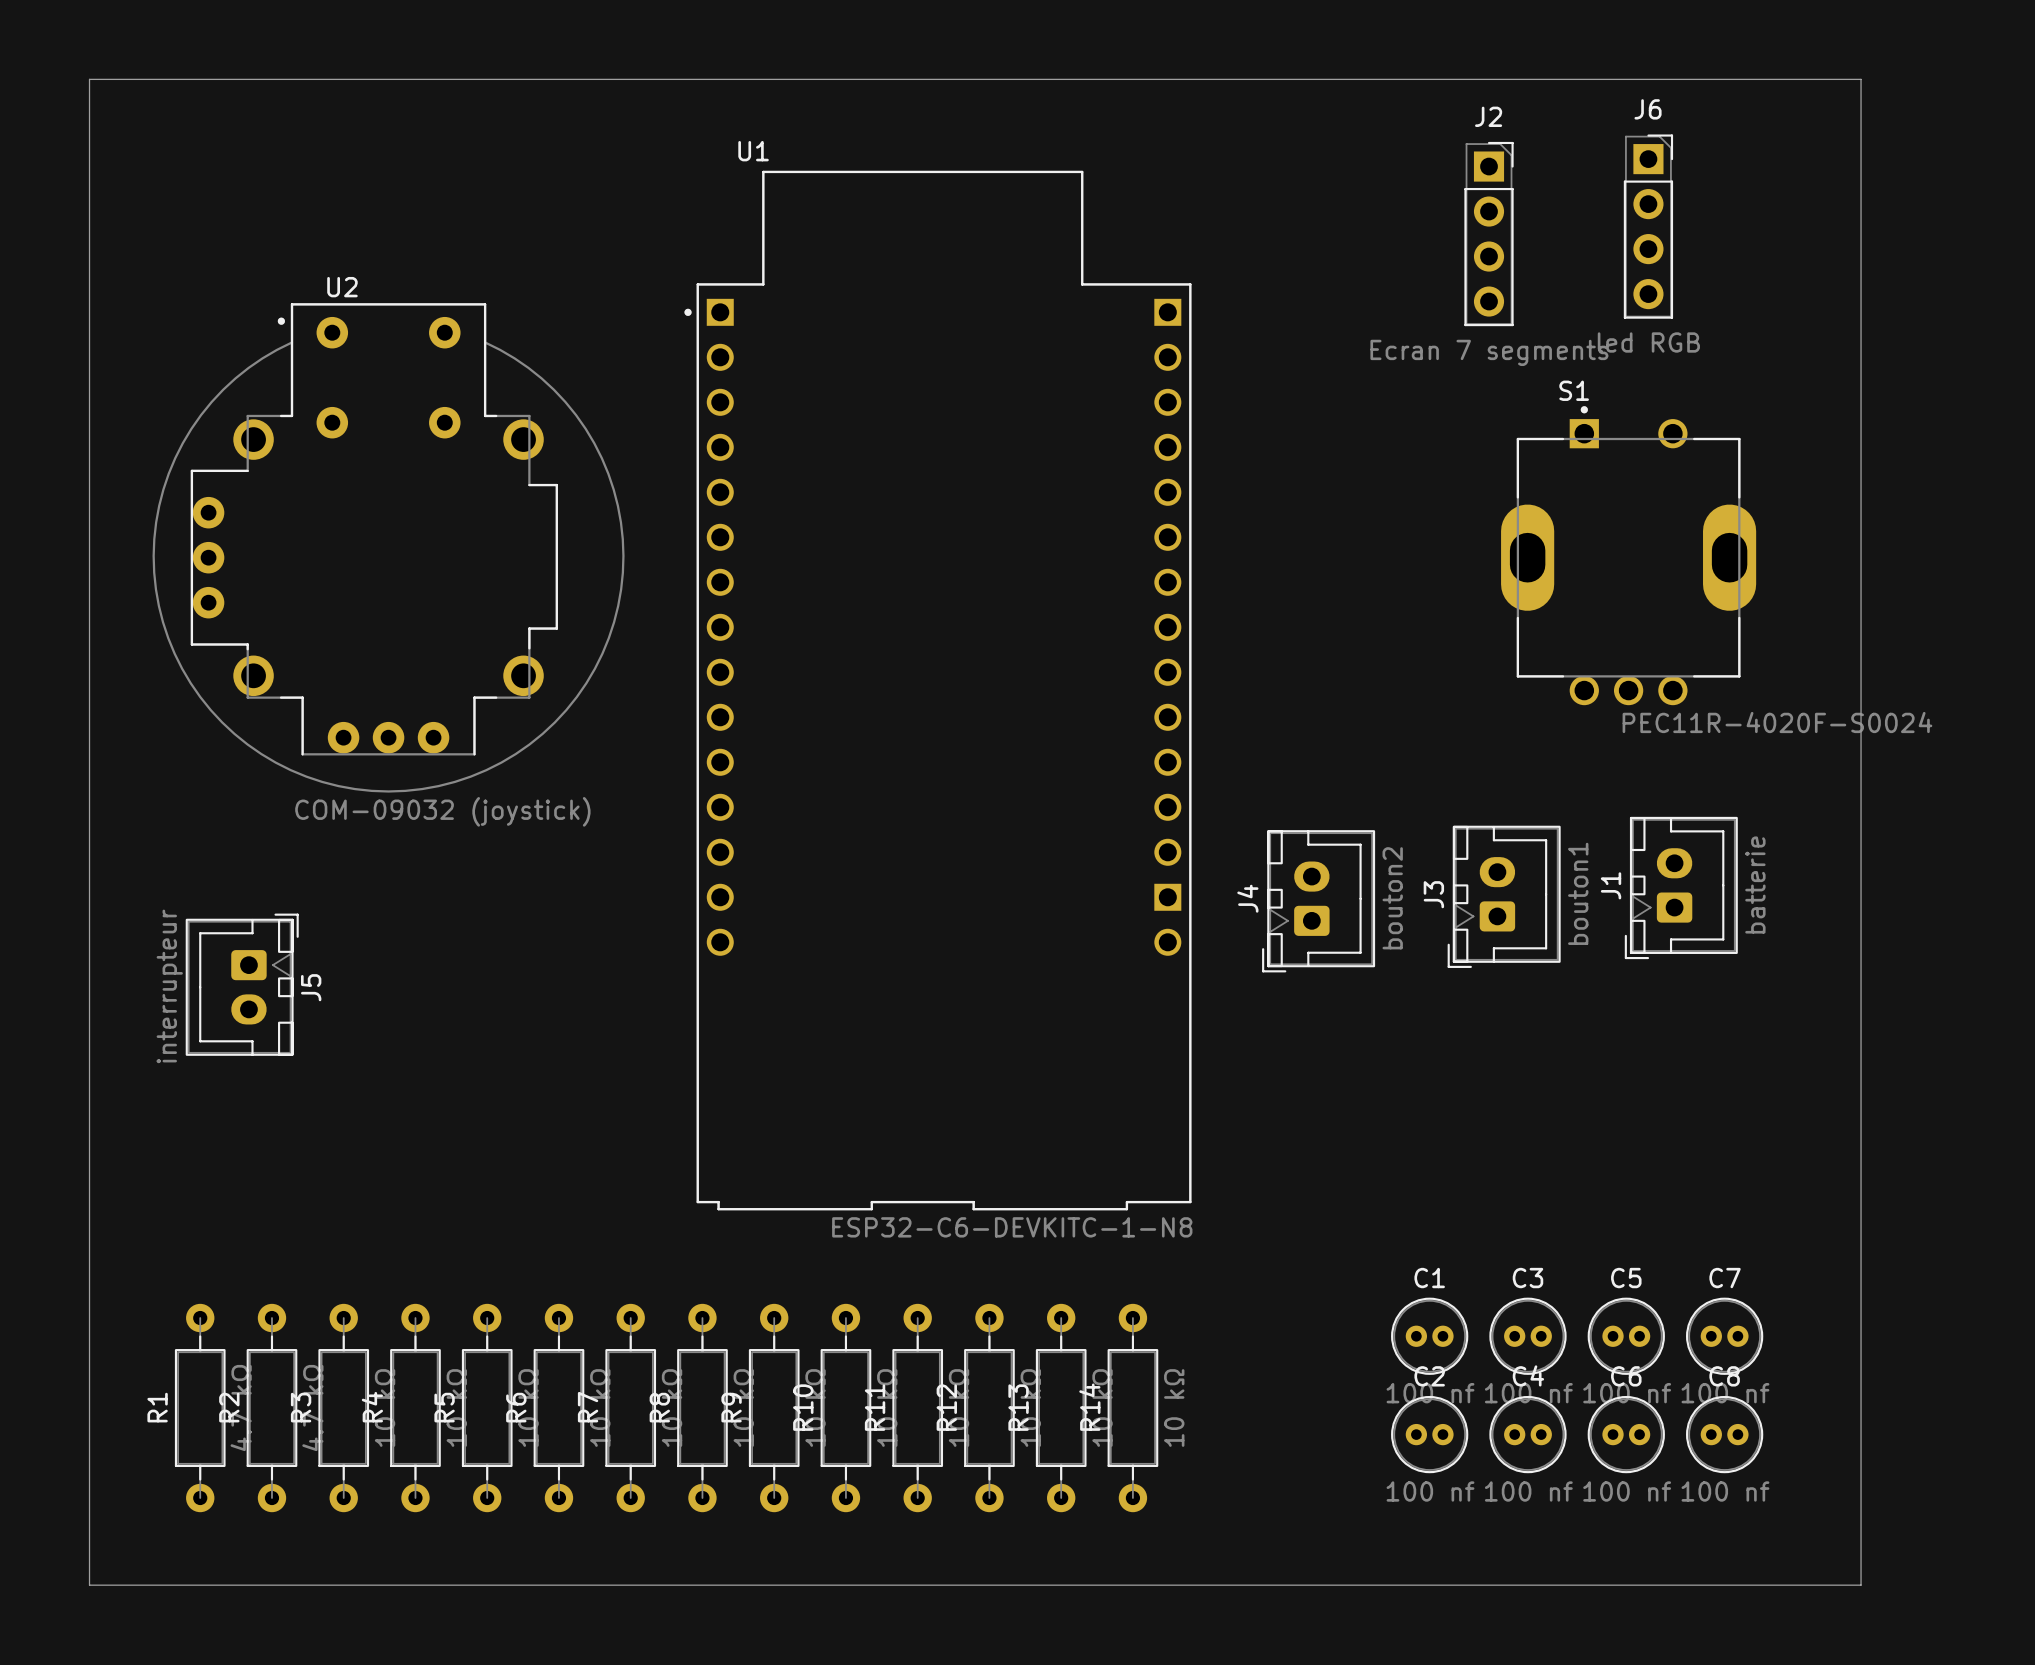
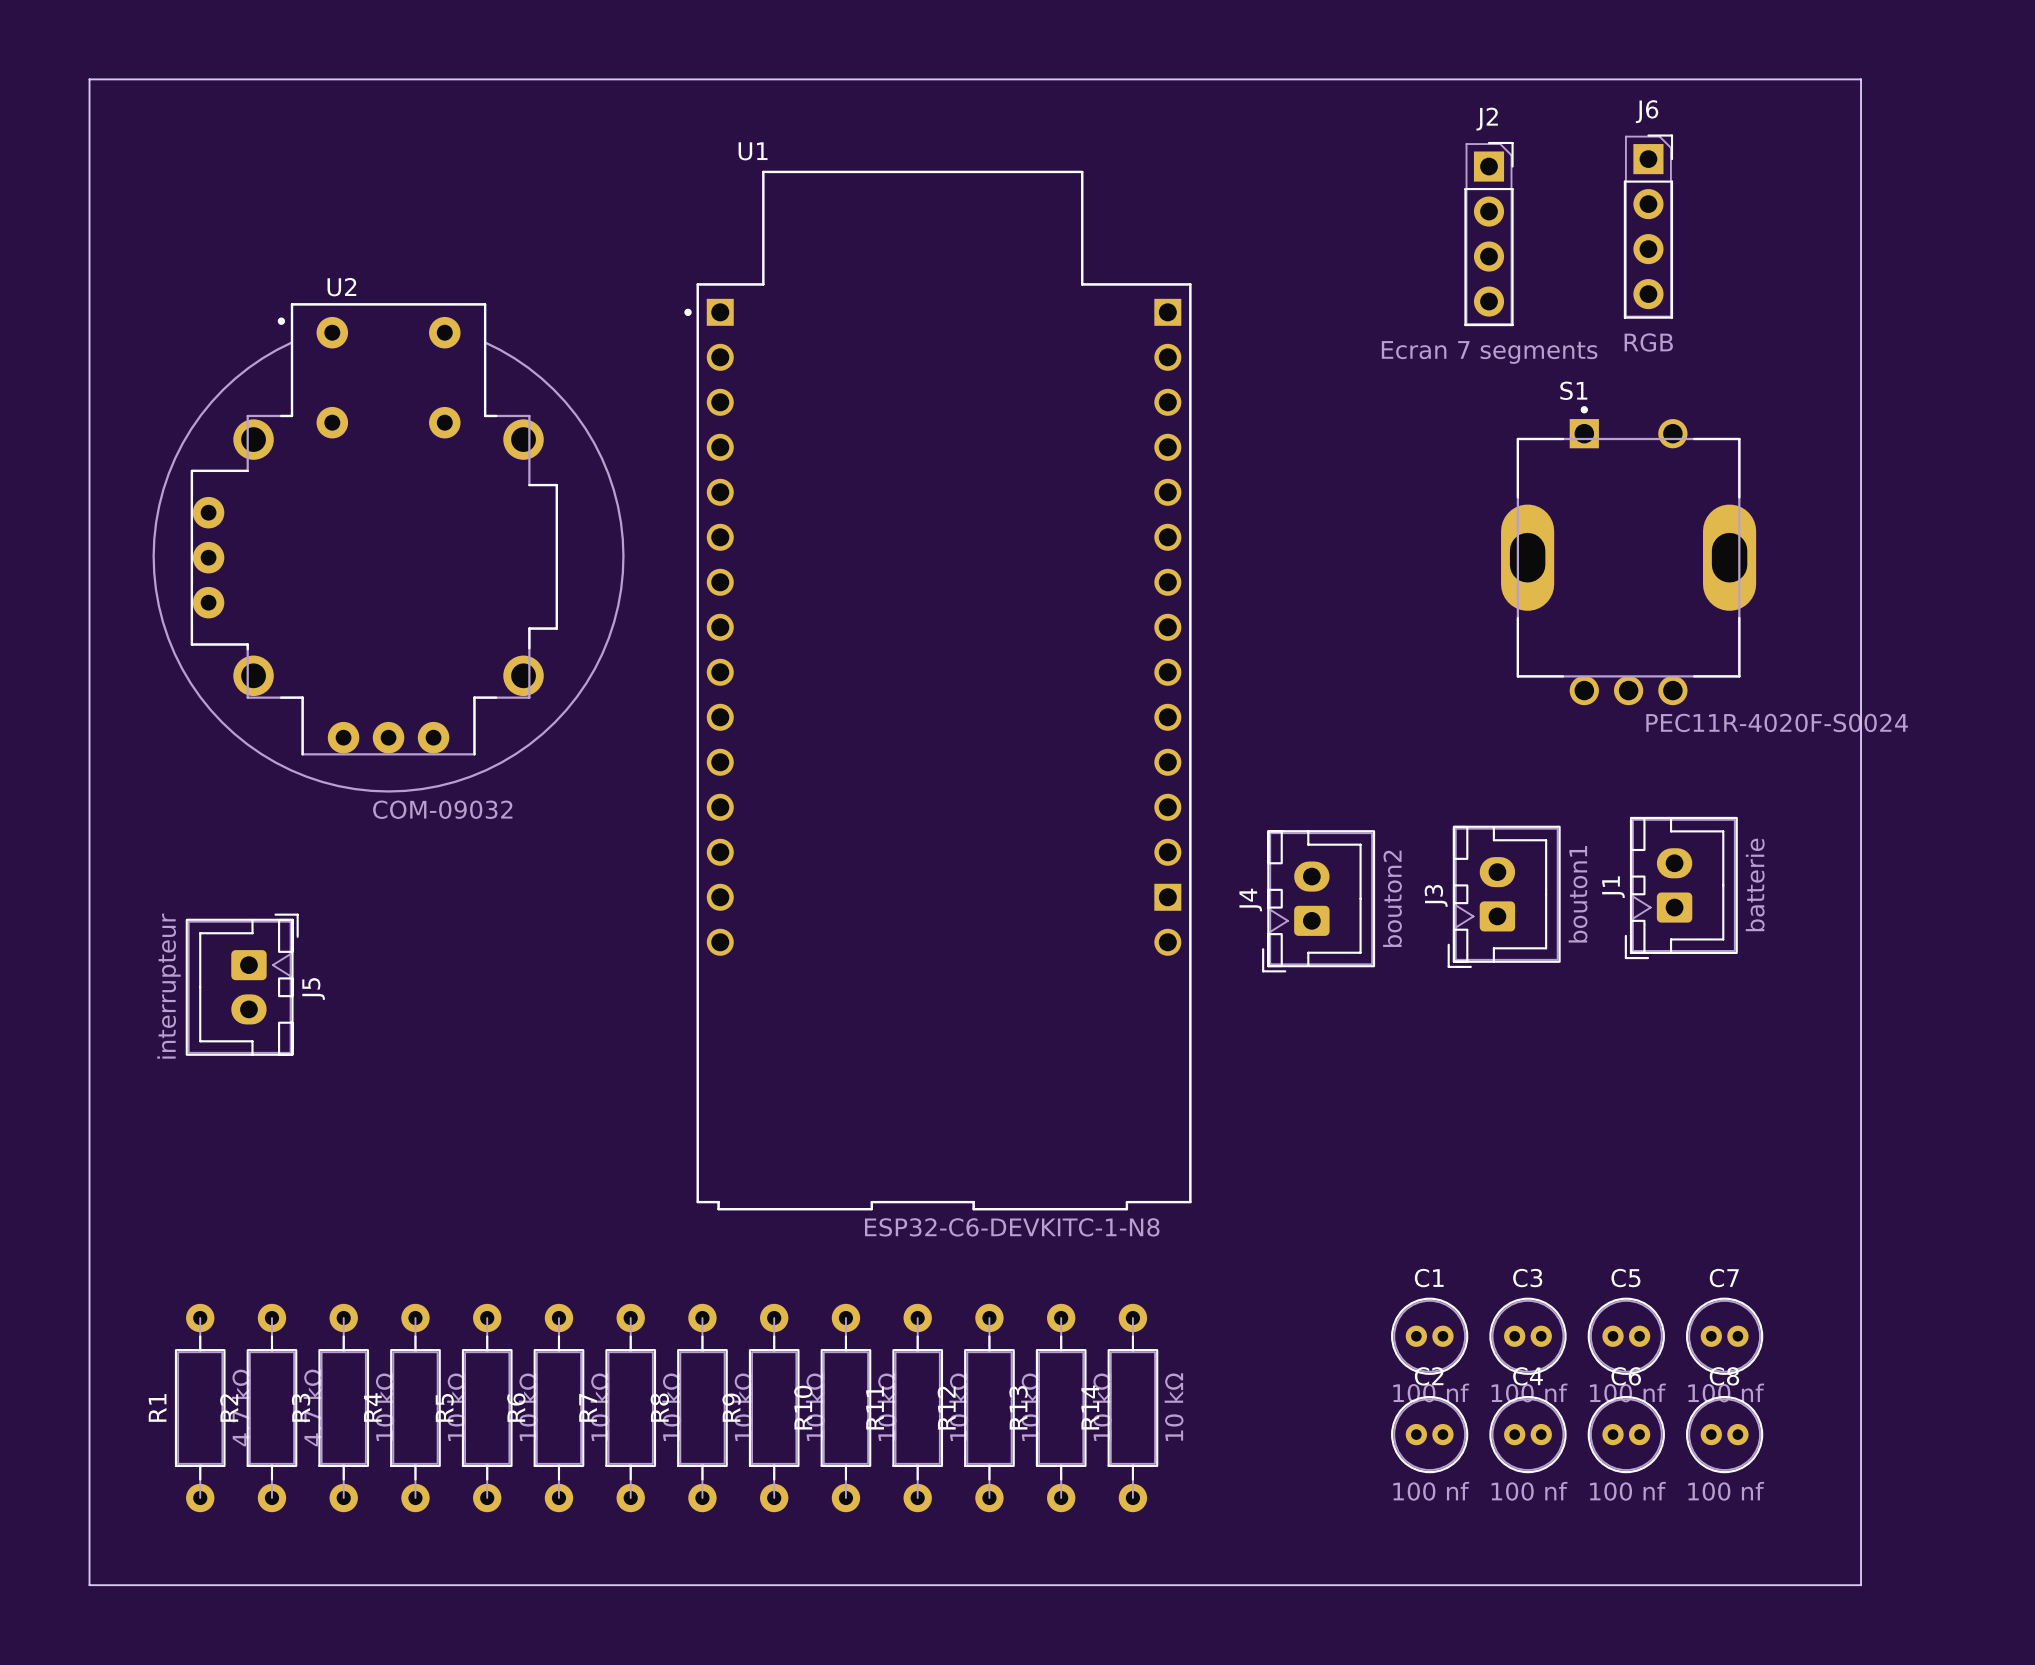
J6 value: led RGB (1648, 342) -> RGB (1648, 342)
U2 value: COM-09032 (joystick) (442, 811) -> COM-09032 (442, 809)

